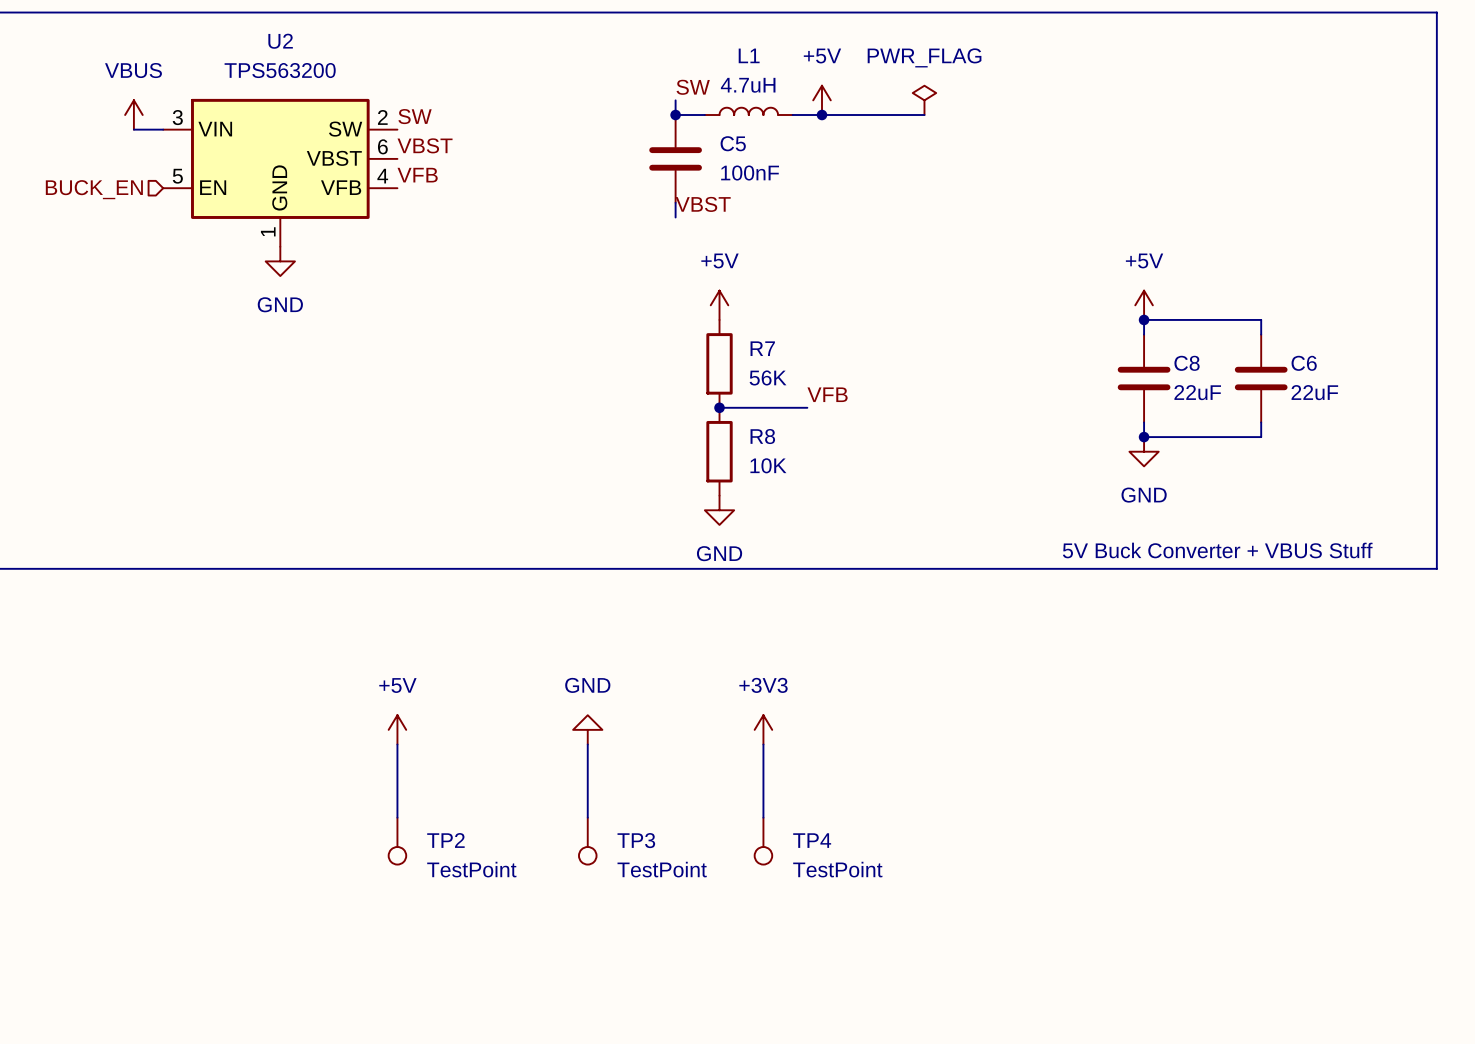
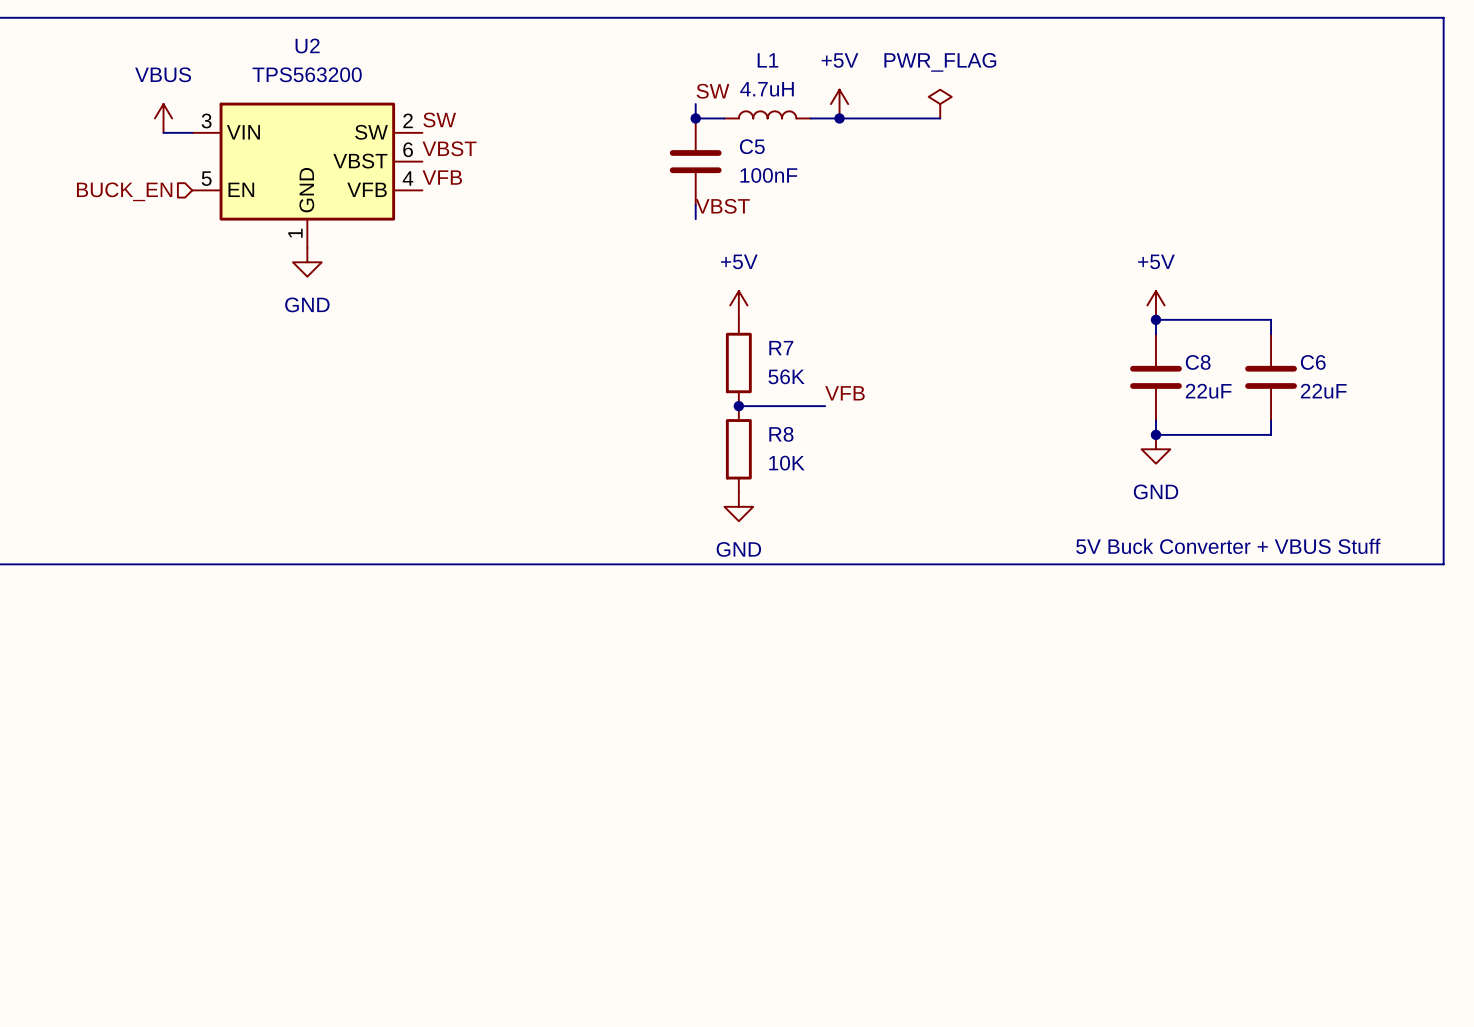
power symbol: +5V (397, 729) -> none
power symbol: GND (587, 729) -> none
power symbol: +3V3 (763, 729) -> none
wire: (397, 744) (397, 817) -> none
wire: (587, 744) (587, 817) -> none
wire: (763, 744) (763, 817) -> none
TP2: TestPoint (397, 841) -> none
TP3: TestPoint (587, 841) -> none
TP4: TestPoint (763, 841) -> none

